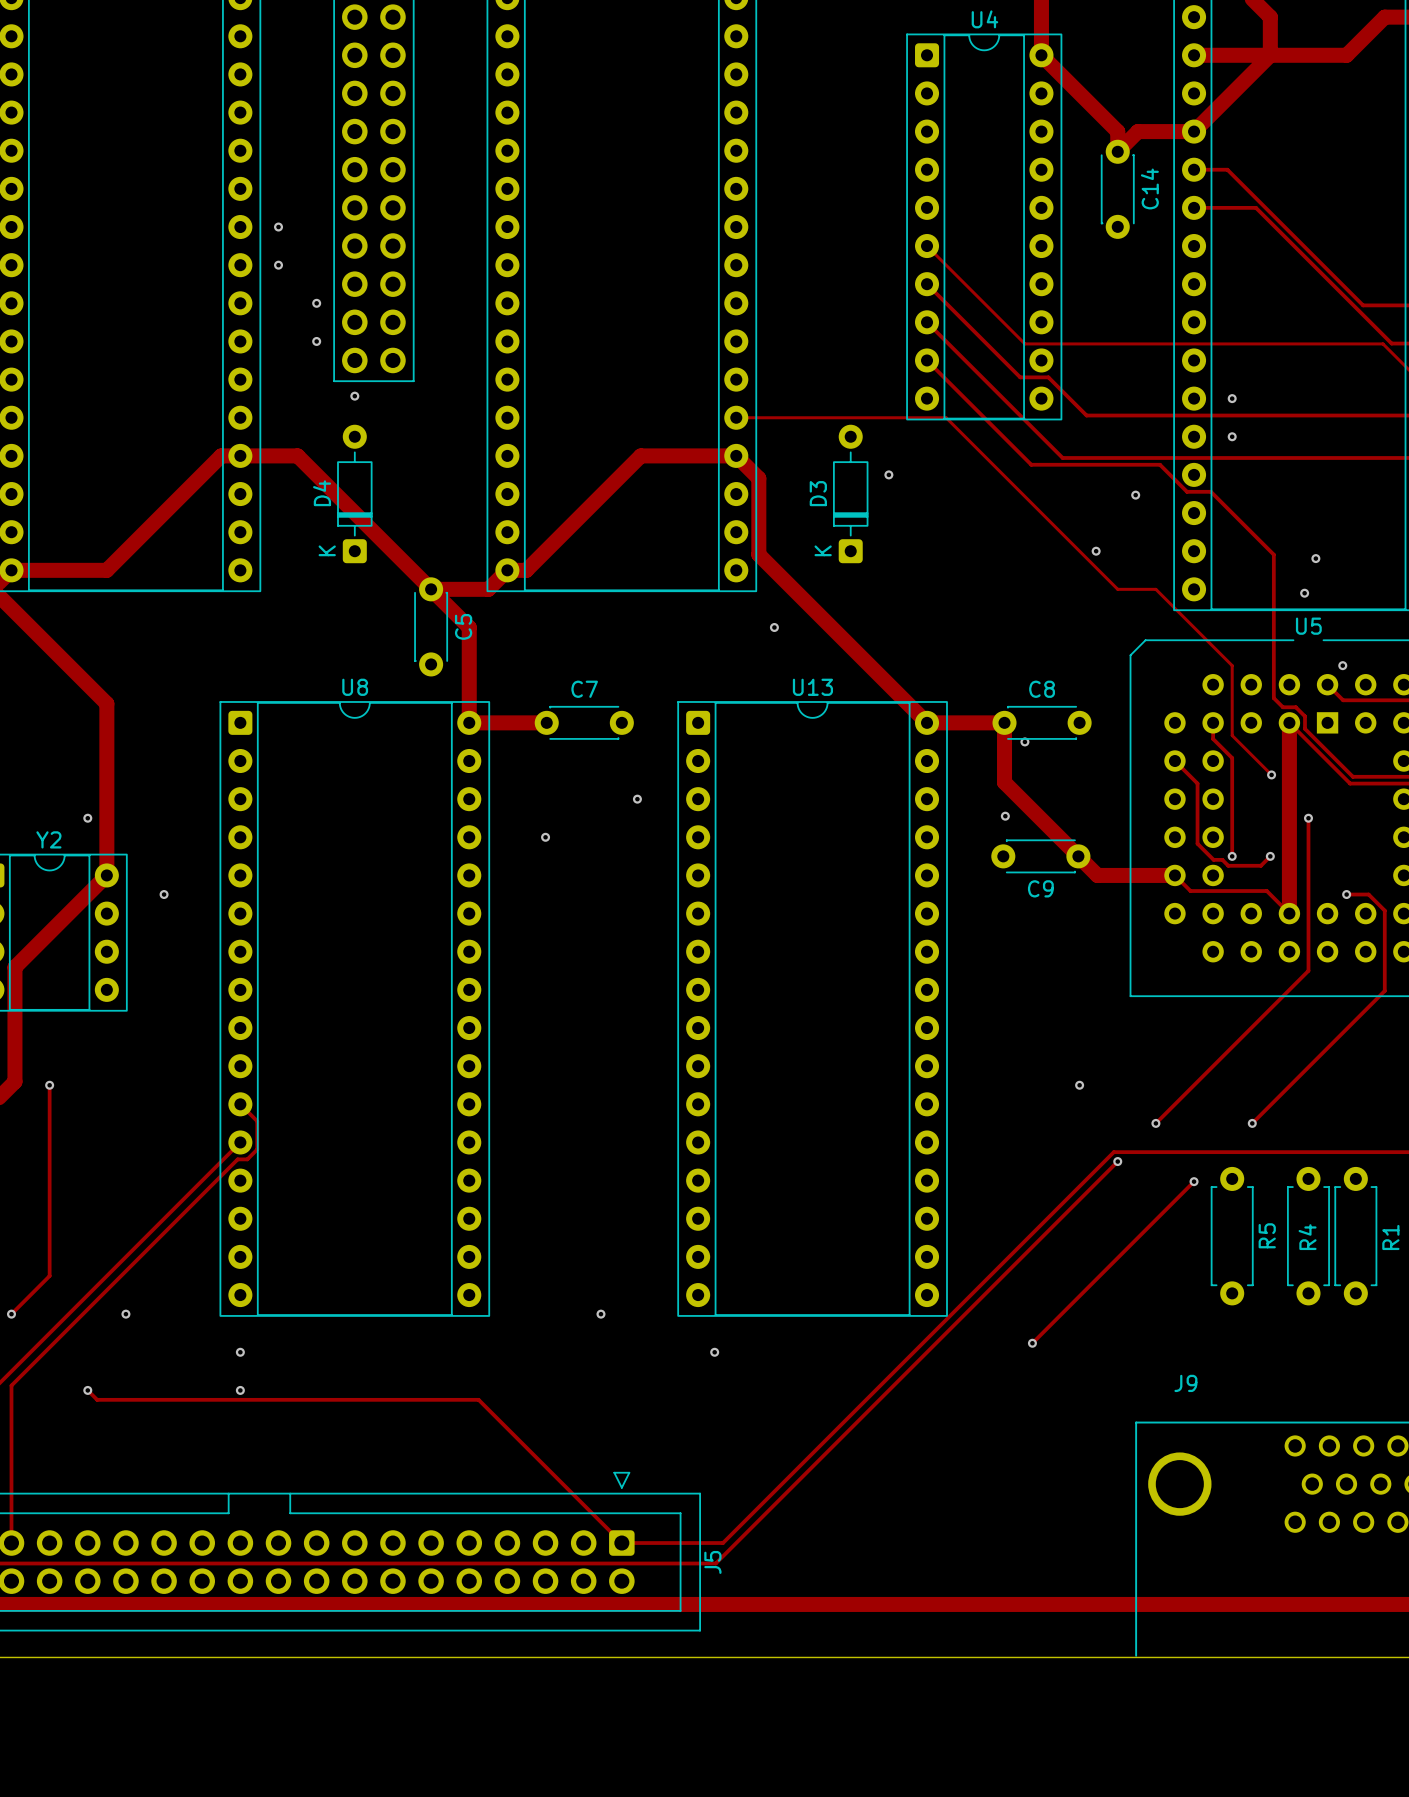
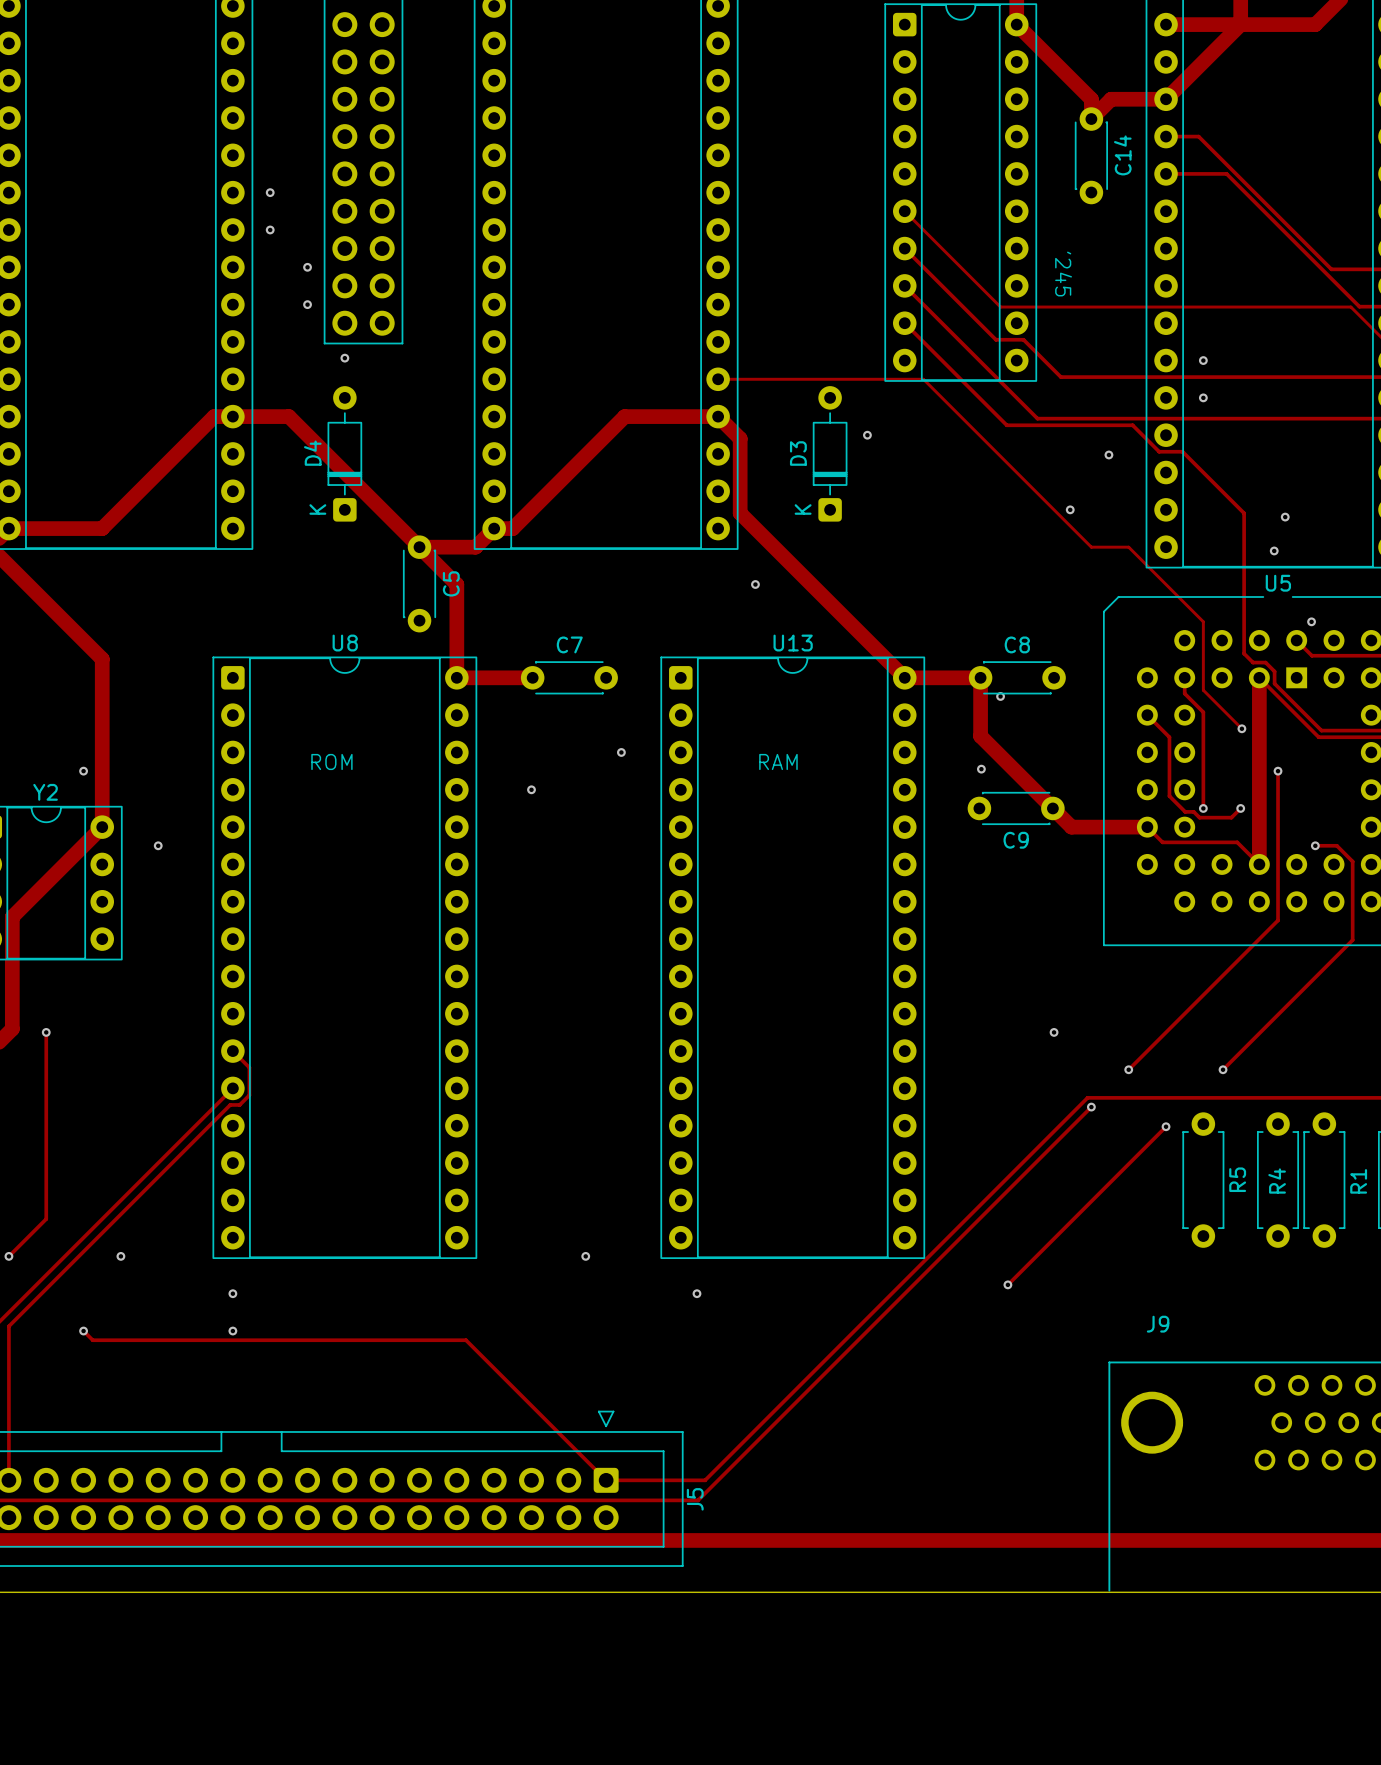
text: none -> '245 (1063, 274)
text: none -> ROM (331, 761)
text: none -> RAM (778, 761)

